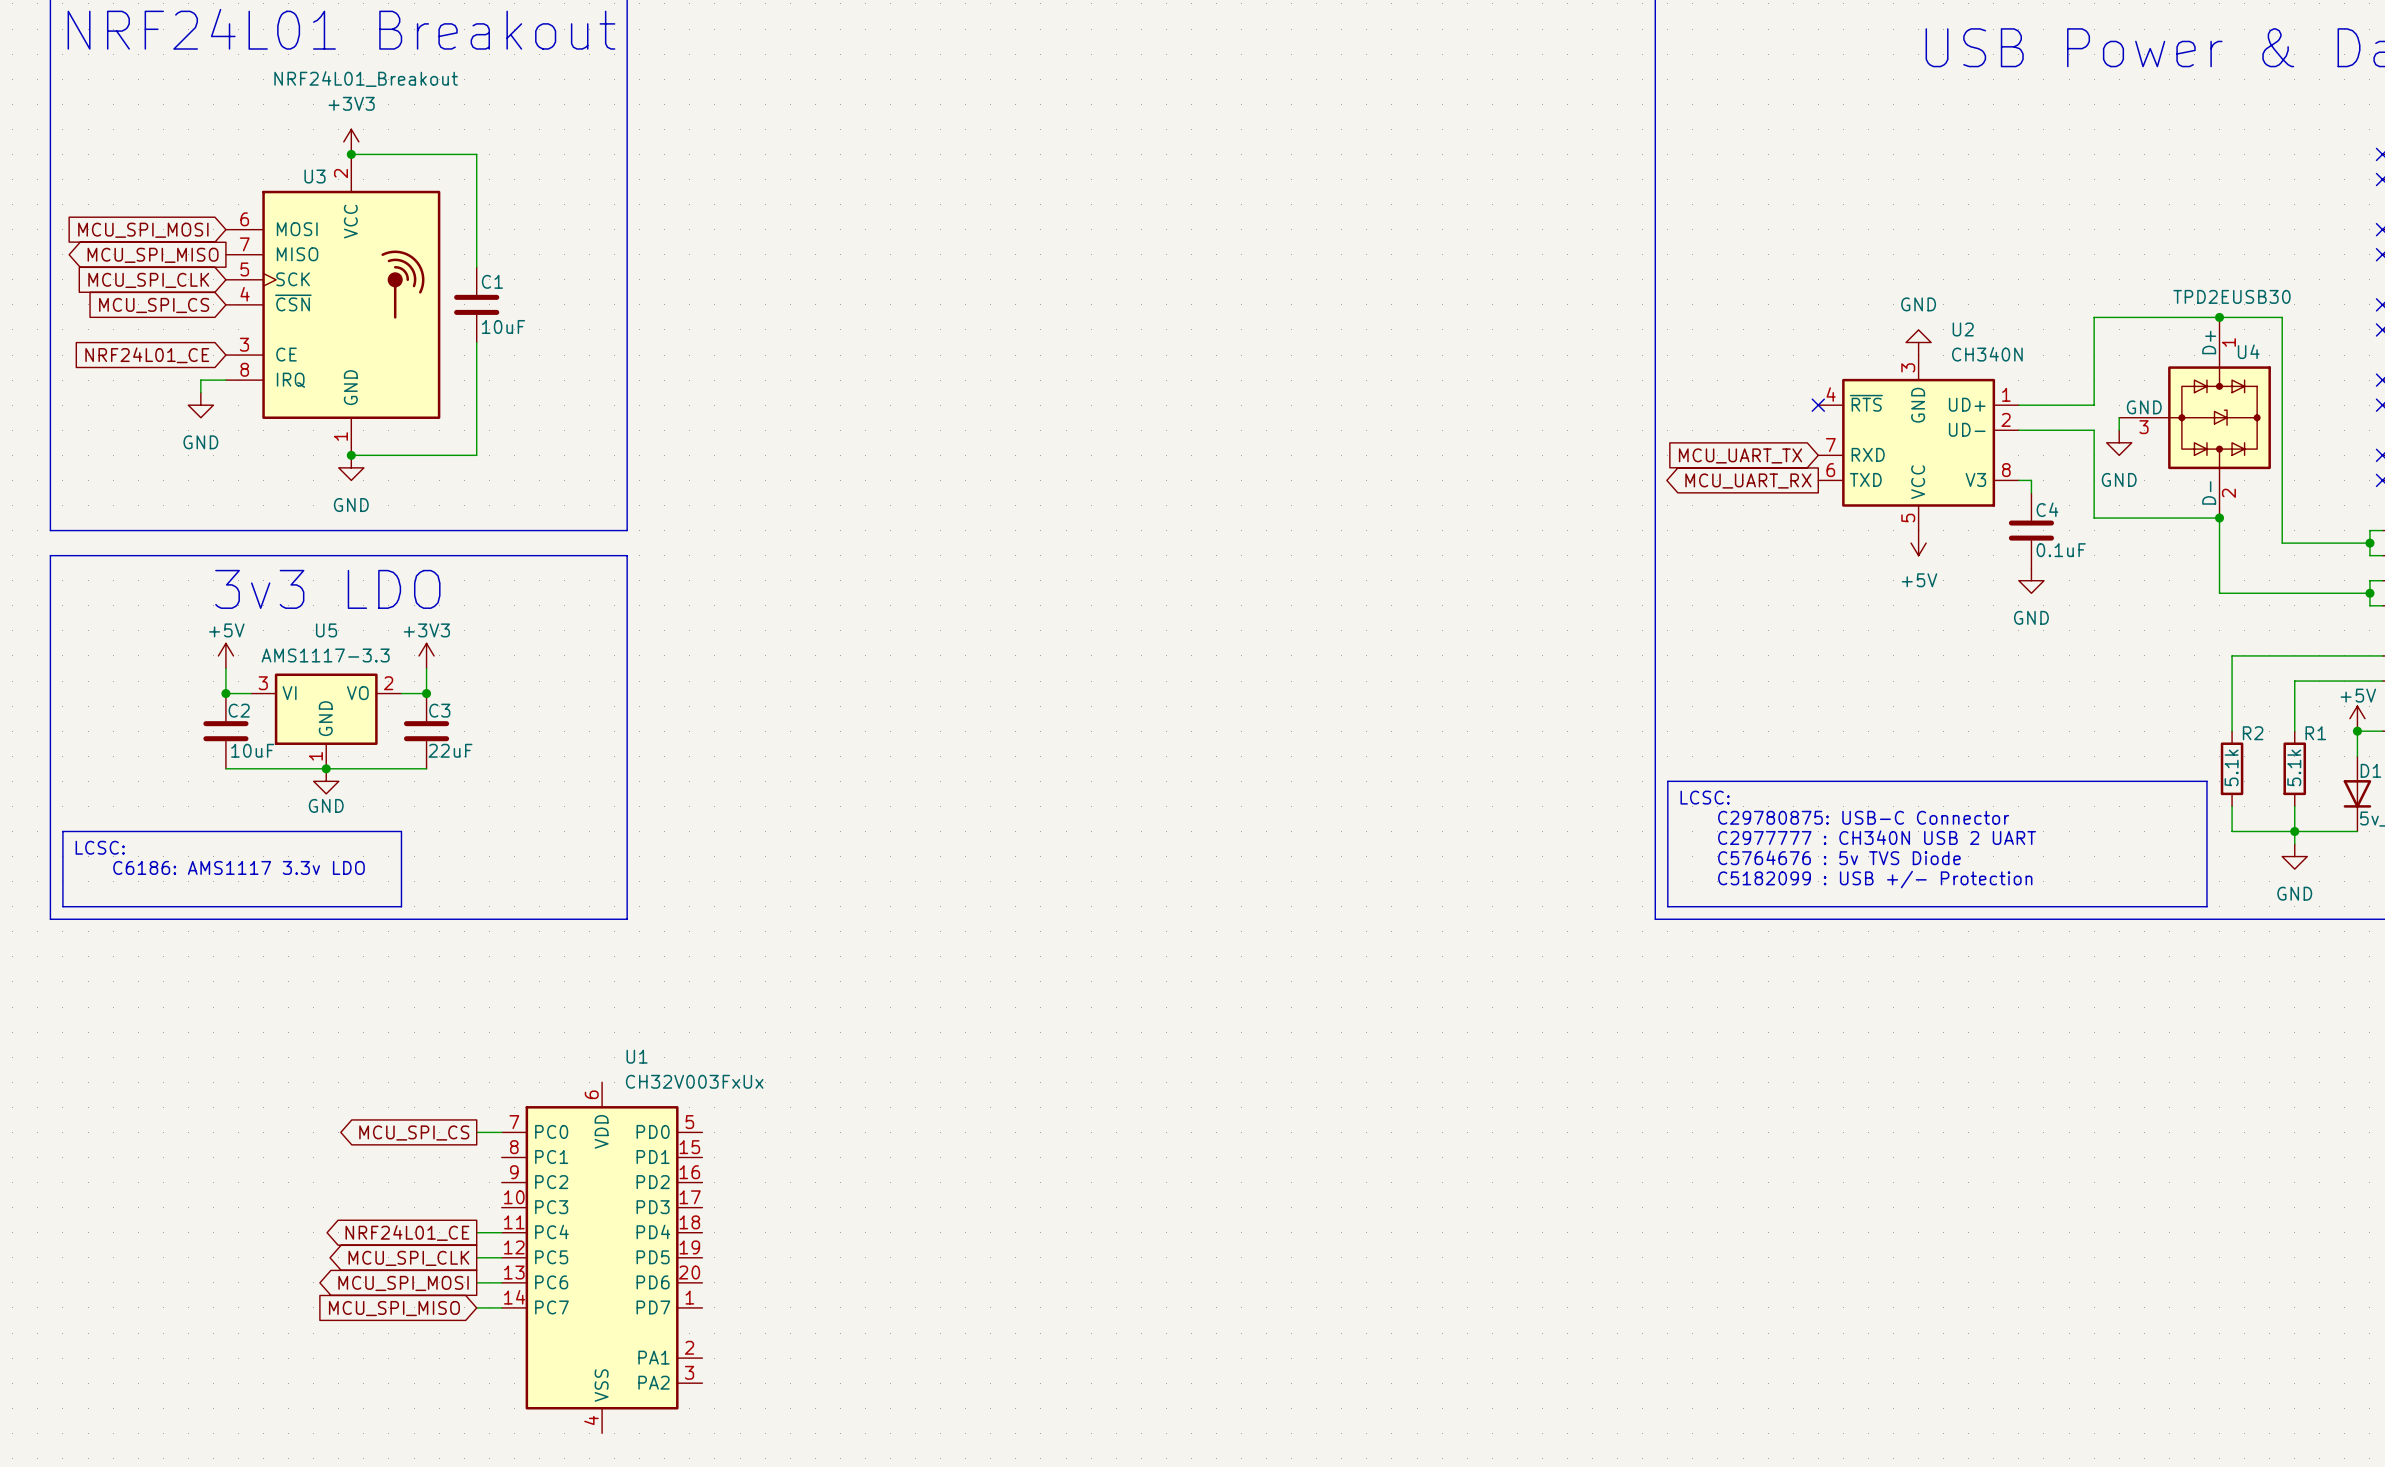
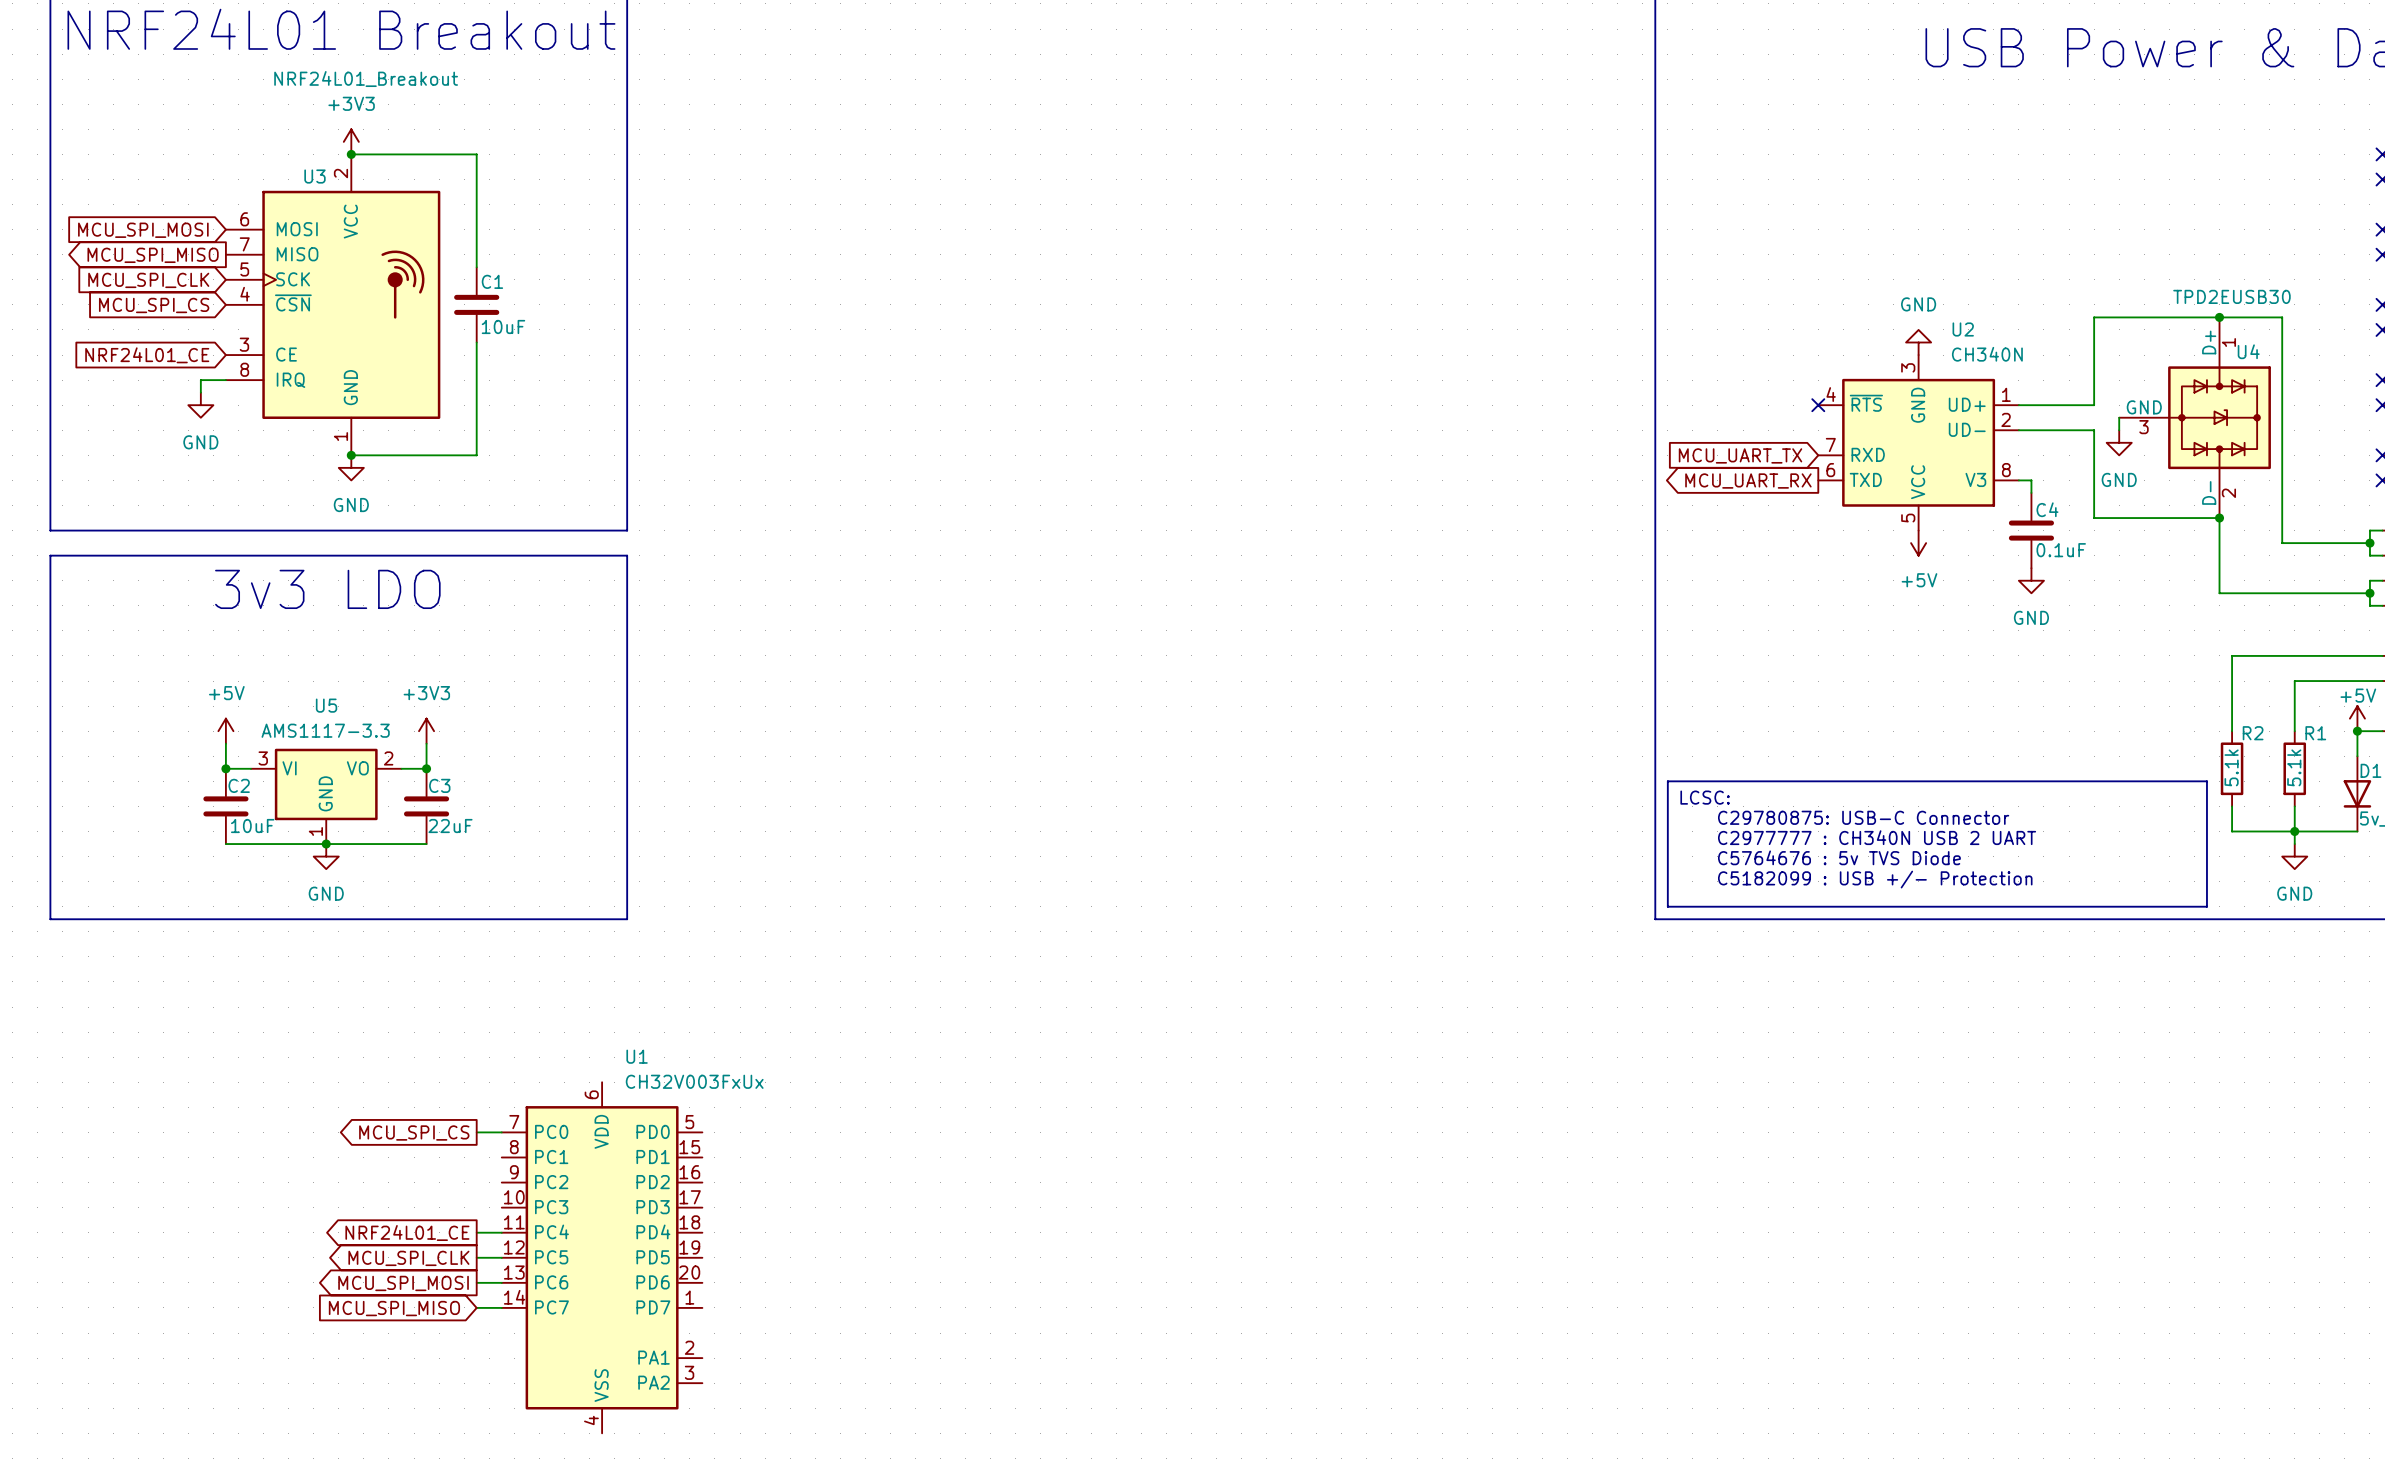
power symbol text position: +5V (226, 630) -> +5V (226, 693)
power symbol text position: +3V3 (426, 630) -> +3V3 (426, 693)
power symbol position: +5V (225, 655) -> +5V (225, 731)
power symbol position: +3V3 (426, 655) -> +3V3 (426, 731)
wire: (225, 668) (225, 693) (251, 693) -> none
wire: (426, 668) (426, 693) (401, 693) -> none
junction: (225, 693) -> none
junction: (426, 693) -> none
U5 position: (326, 721) -> (326, 796)
C2 position: (225, 731) -> (225, 806)
C3 position: (426, 731) -> (426, 806)
junction: none -> (225, 768)
junction: (326, 768) -> none
junction: none -> (426, 768)
power symbol position: GND (326, 781) -> GND (326, 856)
power symbol text position: GND (326, 805) -> GND (326, 893)
line: (62, 831) (401, 831) (401, 906) (62, 906) (62, 831) -> none
wire: none -> (225, 844) (426, 844)
junction: none -> (326, 844)
text: LCSC: (100, 847) -> none
text: C6186: AMS1117 3.3v LDO (239, 867) -> none

